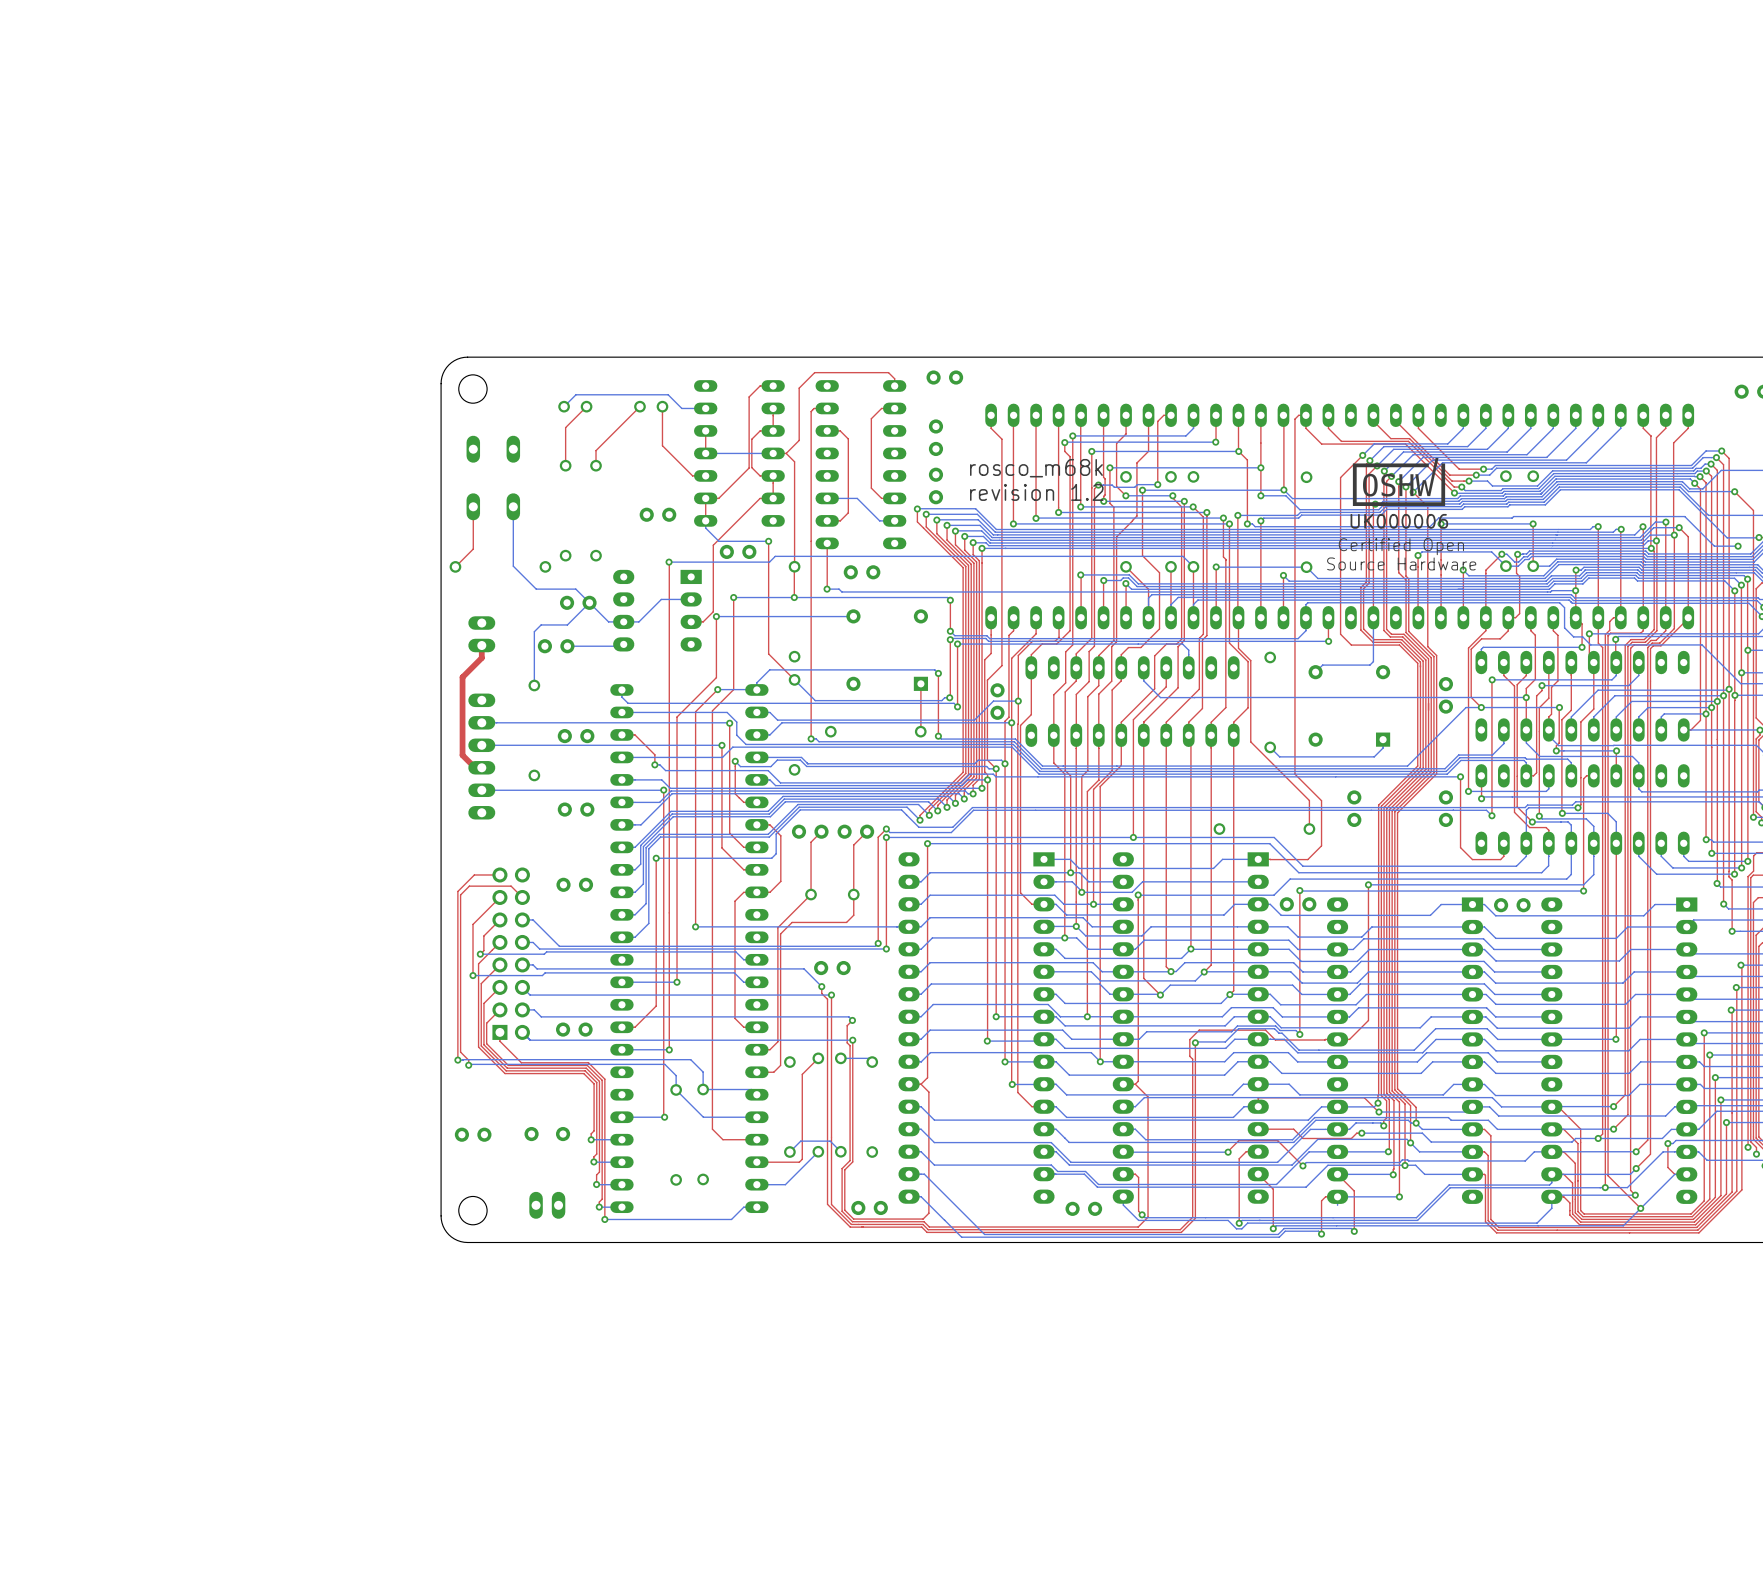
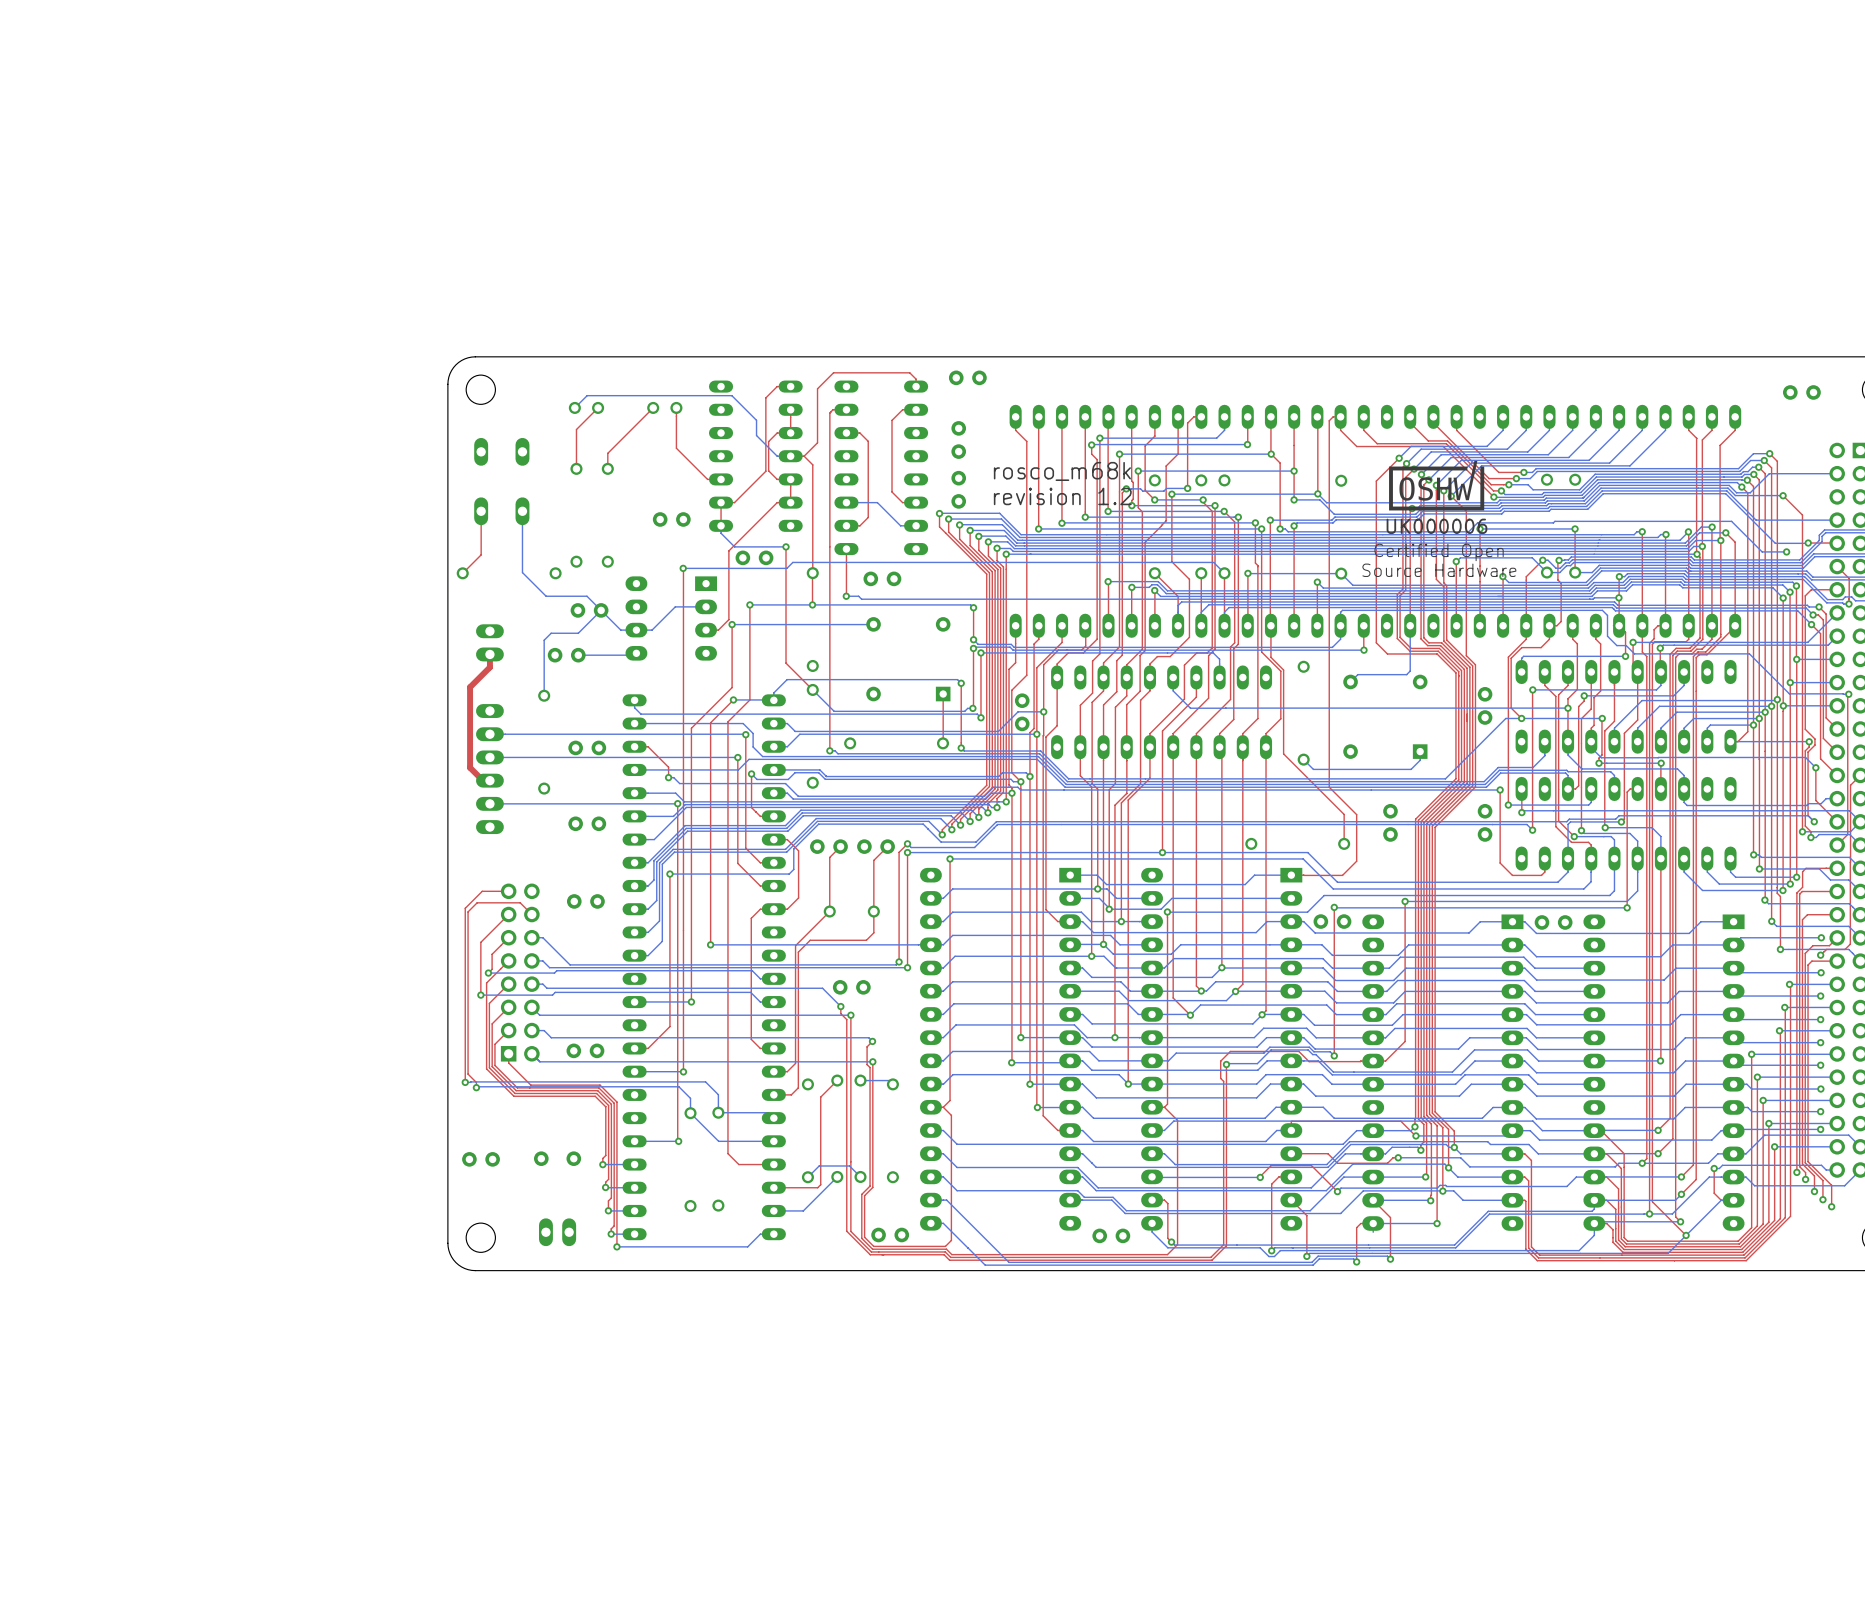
bottom track: (668, 394) (681, 408) (705, 408) -> none
top track: (705, 430) (705, 453) -> none
bottom track: (760, 453) (705, 453) -> (777, 456) (756, 435) (756, 420) (731, 395) (682, 395)

